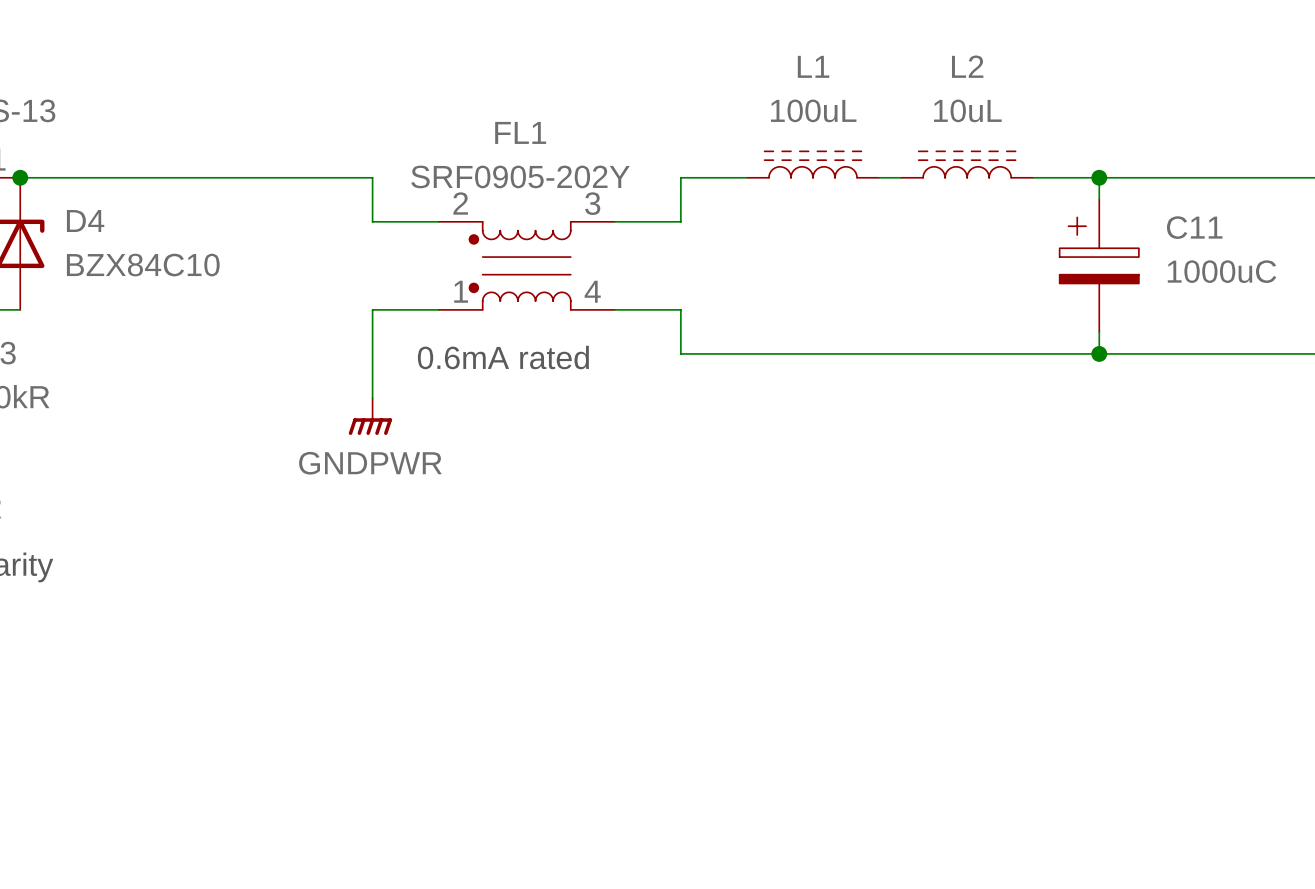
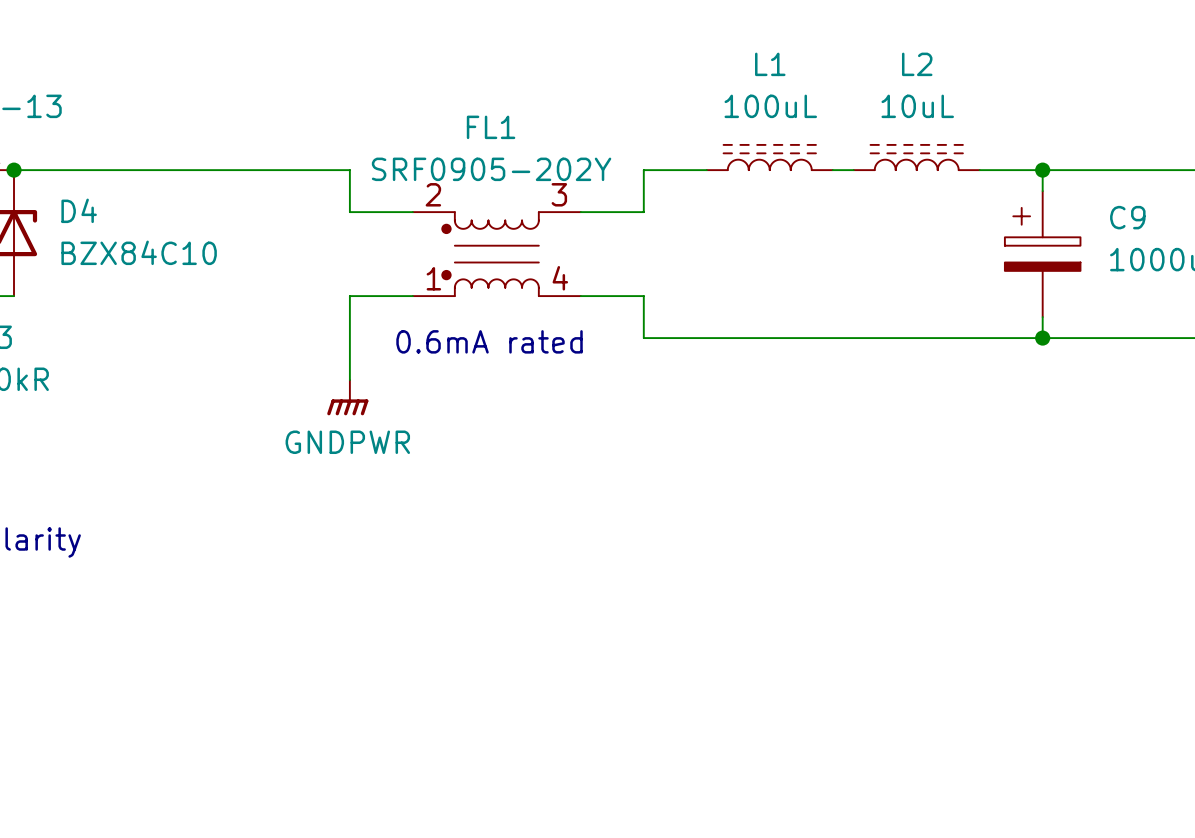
C11 name: C11 (1194, 227) -> C9 (1127, 217)

